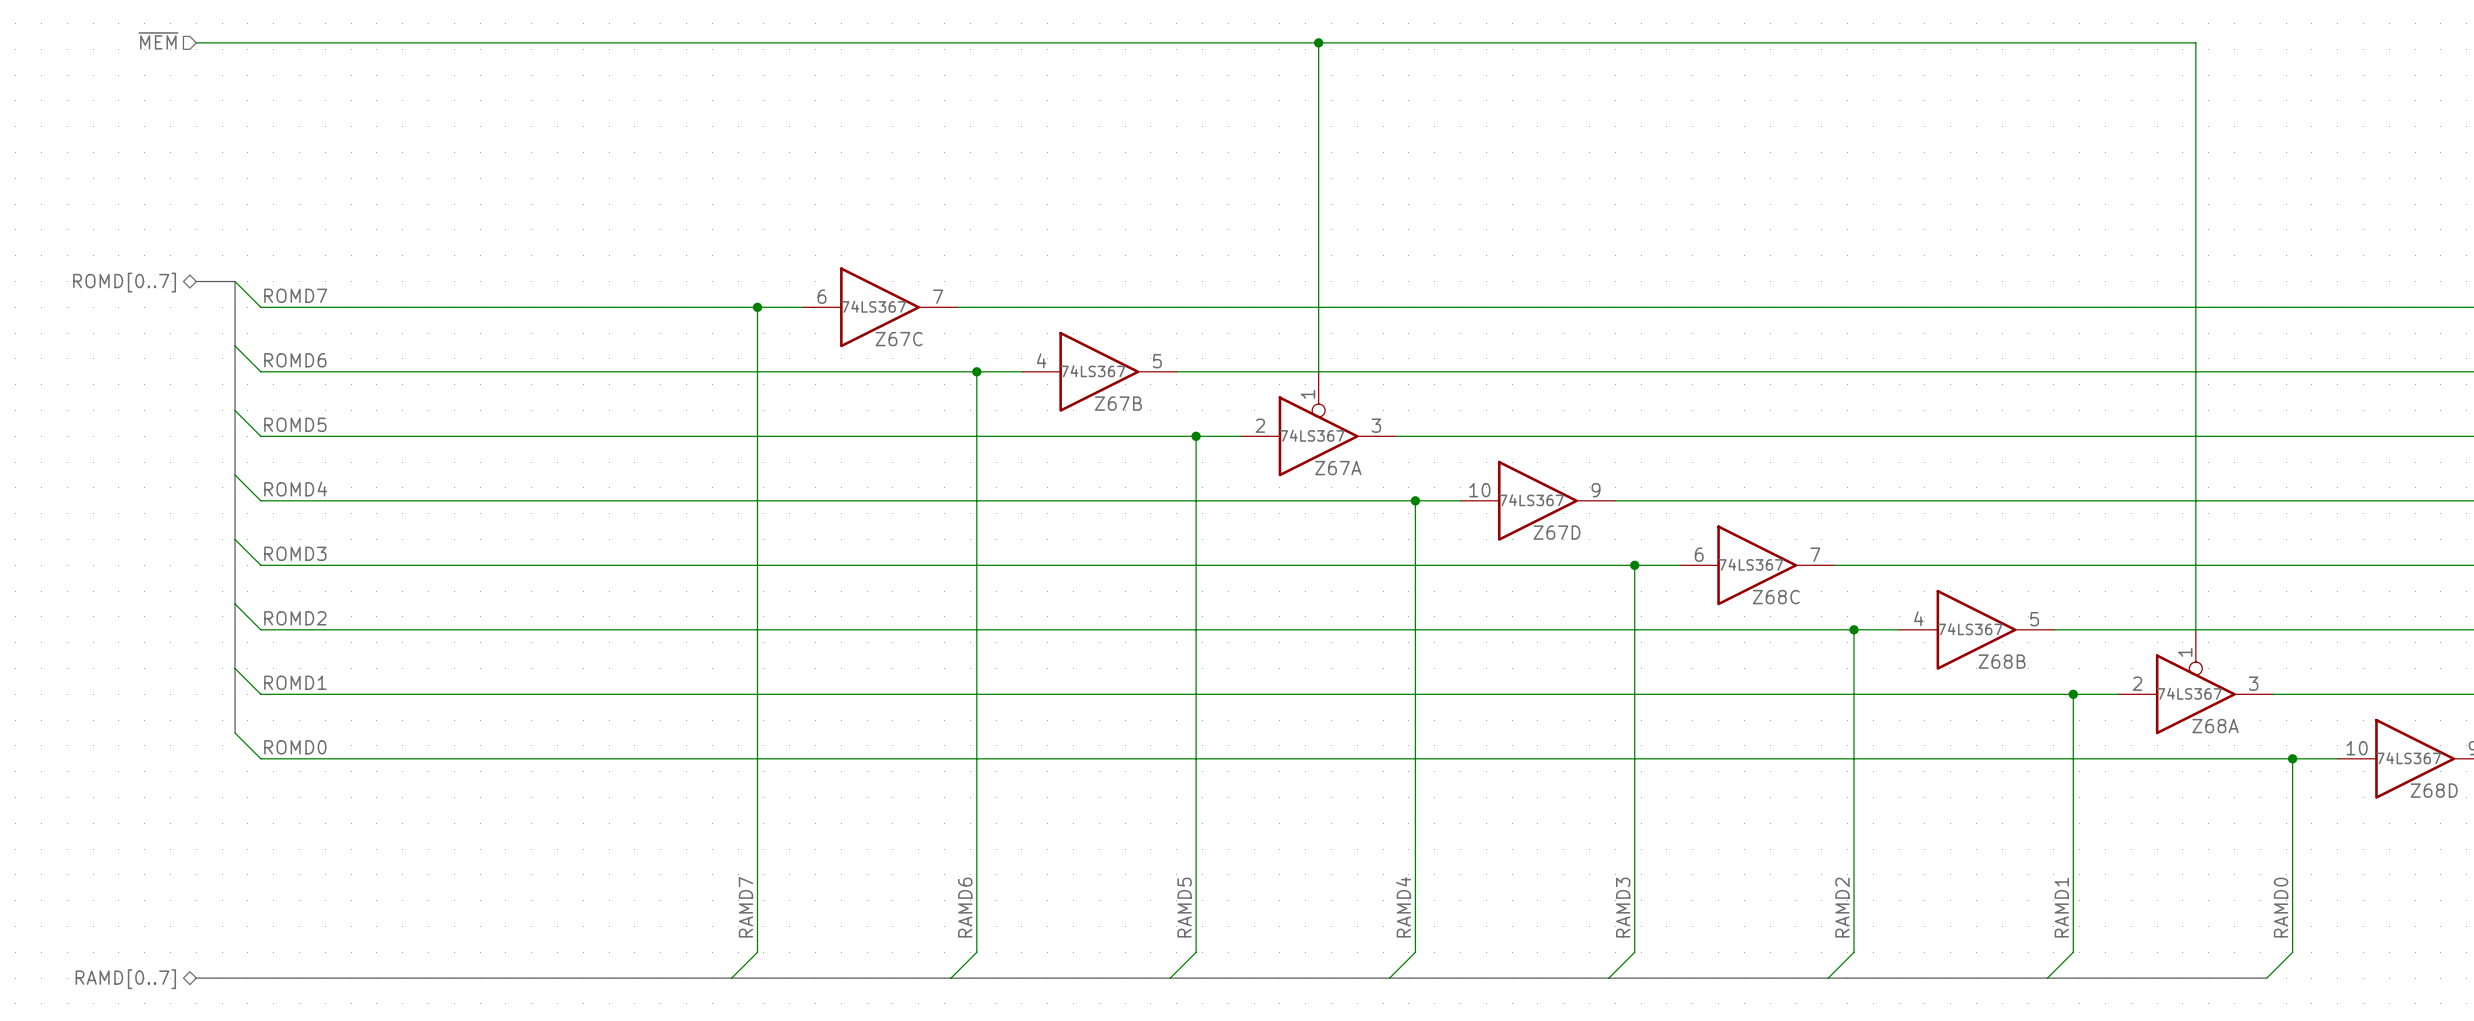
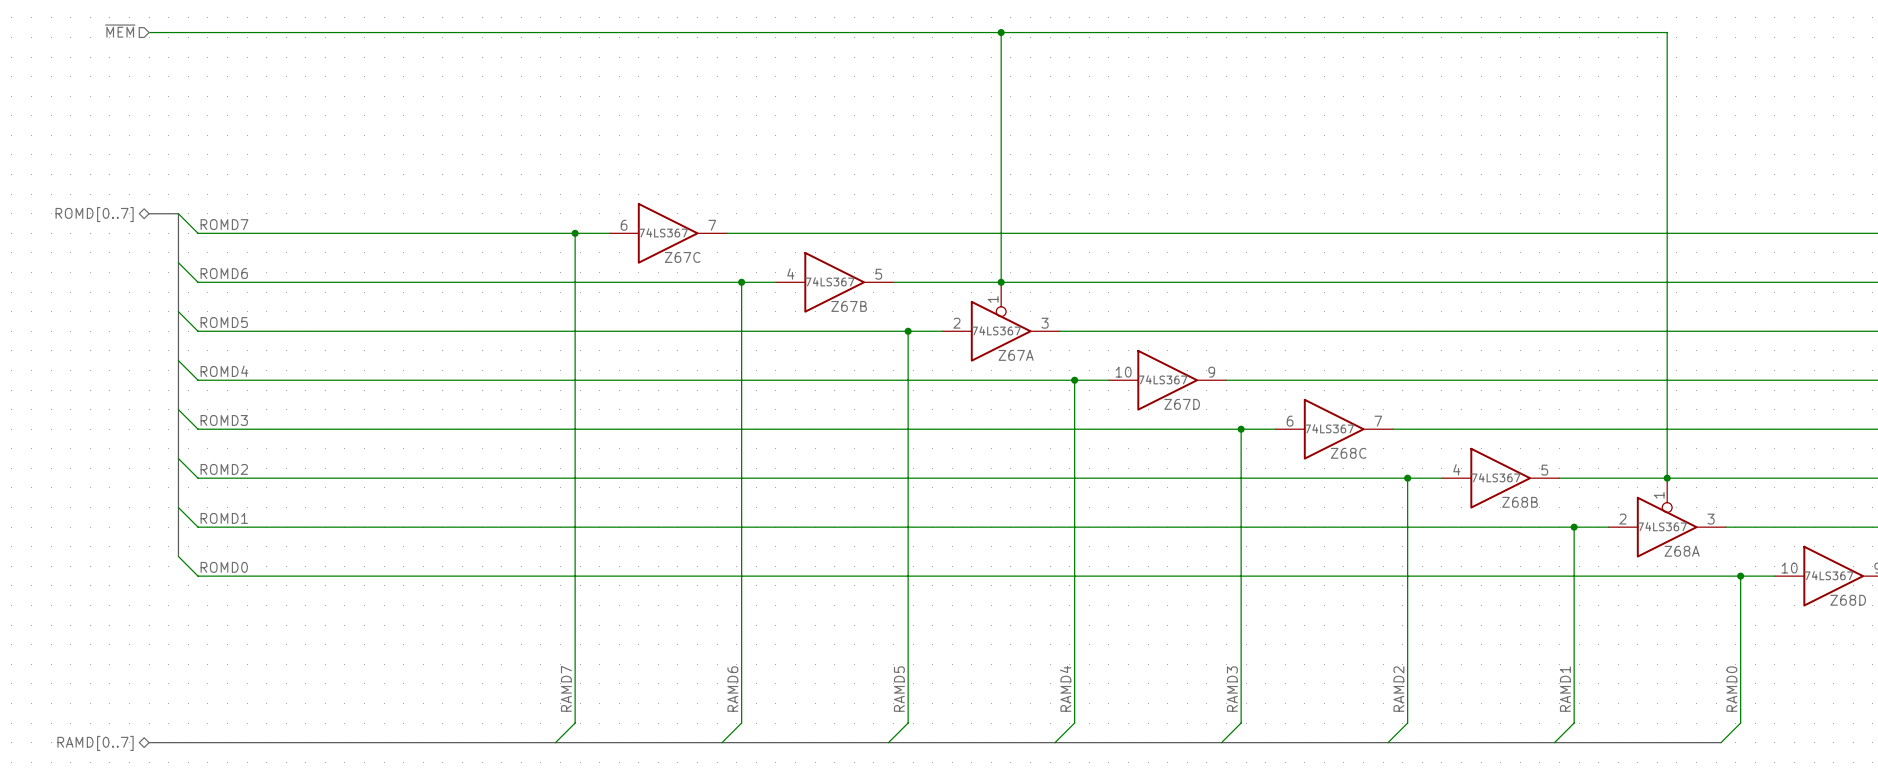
junction: none -> (1001, 282)
junction: none -> (1667, 478)

